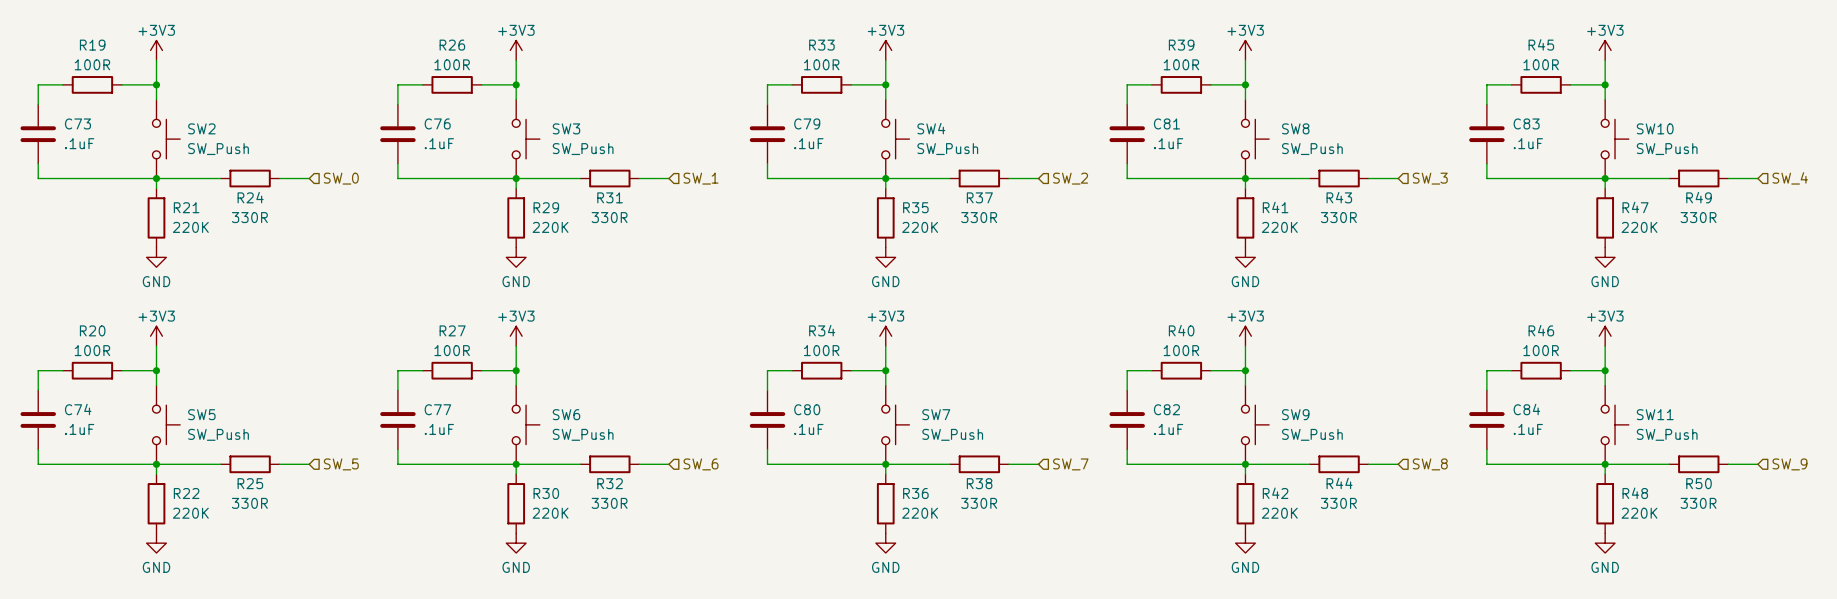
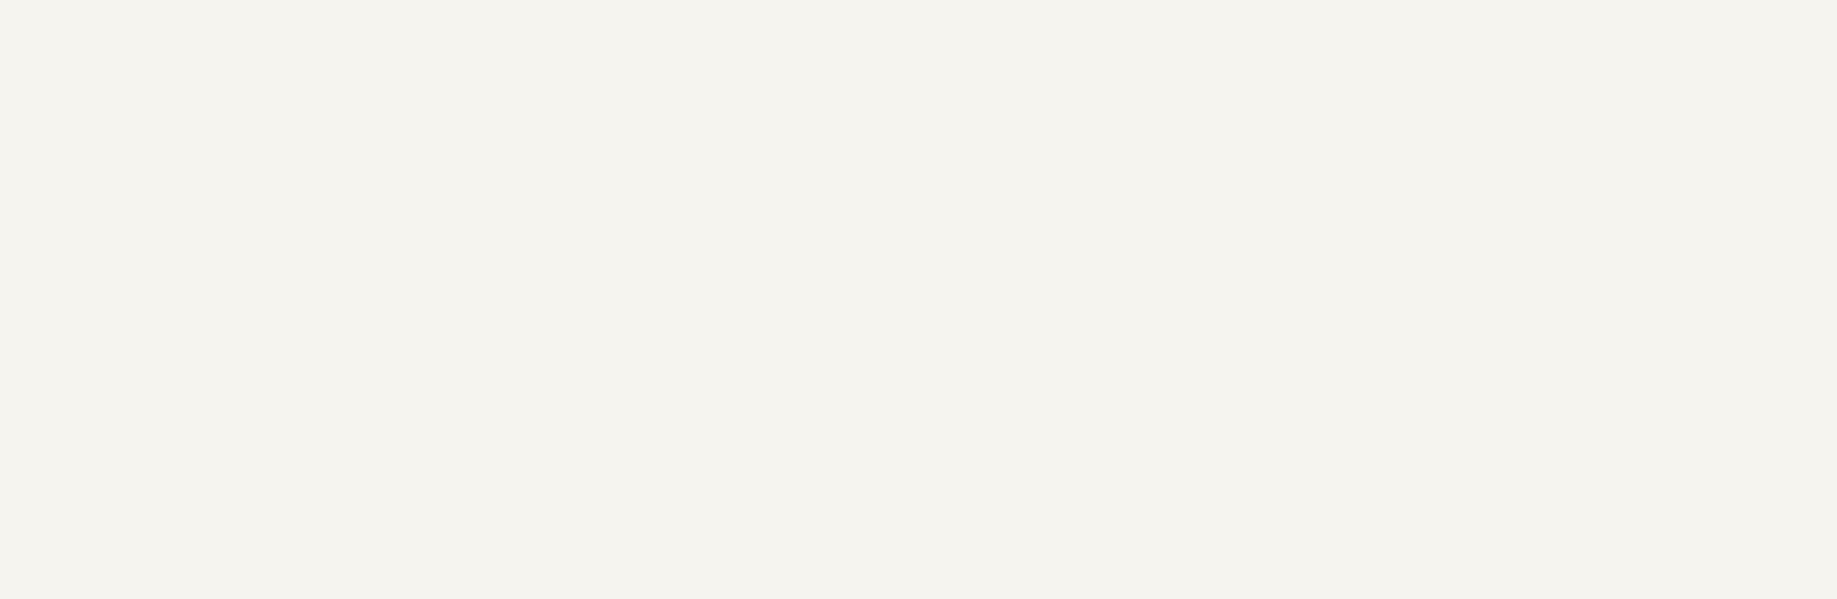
power symbol: +3V3 (156, 50) -> none
power symbol: +3V3 (516, 50) -> none
power symbol: +3V3 (885, 50) -> none
power symbol: +3V3 (1245, 50) -> none
power symbol: +3V3 (1605, 50) -> none
wire: (156, 60) (156, 99) -> none
wire: (516, 60) (516, 99) -> none
wire: (885, 60) (885, 99) -> none
wire: (1245, 60) (1245, 99) -> none
wire: (1605, 60) (1605, 99) -> none
wire: (62, 84) (38, 84) (38, 104) -> none
R19: 100R (92, 84) -> none
wire: (122, 84) (156, 84) -> none
junction: (156, 84) -> none
wire: (422, 84) (397, 84) (397, 104) -> none
R26: 100R (452, 84) -> none
wire: (481, 84) (516, 84) -> none
junction: (516, 84) -> none
wire: (792, 84) (767, 84) (767, 104) -> none
R33: 100R (821, 84) -> none
wire: (851, 84) (885, 84) -> none
junction: (885, 84) -> none
wire: (1151, 84) (1127, 84) (1127, 104) -> none
R39: 100R (1181, 84) -> none
wire: (1210, 84) (1245, 84) -> none
junction: (1245, 84) -> none
wire: (1511, 84) (1486, 84) (1486, 104) -> none
R45: 100R (1541, 84) -> none
wire: (1570, 84) (1605, 84) -> none
junction: (1605, 84) -> none
C73: .1uF (38, 134) -> none
C76: .1uF (397, 134) -> none
C79: .1uF (767, 134) -> none
C81: .1uF (1127, 134) -> none
C83: .1uF (1486, 134) -> none
SW2: SW_Push (166, 139) -> none
SW3: SW_Push (526, 139) -> none
SW4: SW_Push (895, 139) -> none
SW8: SW_Push (1255, 139) -> none
SW10: SW_Push (1615, 139) -> none
wire: (38, 163) (38, 178) (220, 178) -> none
wire: (397, 163) (397, 178) (580, 178) -> none
wire: (767, 163) (767, 178) (949, 178) -> none
wire: (1127, 163) (1127, 178) (1309, 178) -> none
wire: (1486, 163) (1486, 178) (1669, 178) -> none
wire: (156, 178) (156, 188) -> none
junction: (156, 178) -> none
R24: 330R (250, 178) -> none
wire: (279, 178) (309, 178) -> none
hierarchical label: SW_0 (341, 178) -> none
wire: (516, 178) (516, 188) -> none
junction: (516, 178) -> none
R31: 330R (609, 178) -> none
wire: (639, 178) (668, 178) -> none
hierarchical label: SW_1 (701, 178) -> none
wire: (885, 178) (885, 188) -> none
junction: (885, 178) -> none
R37: 330R (979, 178) -> none
wire: (1008, 178) (1038, 178) -> none
hierarchical label: SW_2 (1070, 178) -> none
wire: (1245, 178) (1245, 188) -> none
junction: (1245, 178) -> none
R43: 330R (1339, 178) -> none
wire: (1368, 178) (1398, 178) -> none
hierarchical label: SW_3 (1430, 178) -> none
wire: (1605, 178) (1605, 188) -> none
junction: (1605, 178) -> none
R49: 330R (1698, 178) -> none
wire: (1728, 178) (1757, 178) -> none
hierarchical label: SW_4 (1790, 178) -> none
R21: 220K (156, 217) -> none
R29: 220K (516, 217) -> none
R35: 220K (885, 217) -> none
R41: 220K (1245, 217) -> none
R47: 220K (1605, 217) -> none
power symbol: GND (156, 257) -> none
power symbol: GND (516, 257) -> none
power symbol: GND (885, 257) -> none
power symbol: GND (1245, 257) -> none
power symbol: GND (1605, 257) -> none
power symbol: +3V3 (156, 336) -> none
power symbol: +3V3 (516, 336) -> none
power symbol: +3V3 (885, 336) -> none
power symbol: +3V3 (1245, 336) -> none
power symbol: +3V3 (1605, 336) -> none
wire: (156, 346) (156, 385) -> none
wire: (516, 346) (516, 385) -> none
wire: (885, 346) (885, 385) -> none
wire: (1245, 346) (1245, 385) -> none
wire: (1605, 346) (1605, 385) -> none
wire: (62, 370) (38, 370) (38, 390) -> none
R20: 100R (92, 370) -> none
wire: (122, 370) (156, 370) -> none
junction: (156, 370) -> none
wire: (422, 370) (397, 370) (397, 390) -> none
R27: 100R (452, 370) -> none
wire: (481, 370) (516, 370) -> none
junction: (516, 370) -> none
wire: (792, 370) (767, 370) (767, 390) -> none
R34: 100R (821, 370) -> none
wire: (851, 370) (885, 370) -> none
junction: (885, 370) -> none
wire: (1151, 370) (1127, 370) (1127, 390) -> none
R40: 100R (1181, 370) -> none
wire: (1210, 370) (1245, 370) -> none
junction: (1245, 370) -> none
wire: (1511, 370) (1486, 370) (1486, 390) -> none
R46: 100R (1541, 370) -> none
wire: (1570, 370) (1605, 370) -> none
junction: (1605, 370) -> none
C74: .1uF (38, 419) -> none
C77: .1uF (397, 419) -> none
C80: .1uF (767, 419) -> none
C82: .1uF (1127, 419) -> none
C84: .1uF (1486, 419) -> none
SW5: SW_Push (166, 424) -> none
SW6: SW_Push (526, 424) -> none
SW7: SW_Push (895, 424) -> none
SW9: SW_Push (1255, 424) -> none
SW11: SW_Push (1615, 424) -> none
wire: (38, 449) (38, 464) (220, 464) -> none
wire: (397, 449) (397, 464) (580, 464) -> none
wire: (767, 449) (767, 464) (949, 464) -> none
wire: (1127, 449) (1127, 464) (1309, 464) -> none
wire: (1486, 449) (1486, 464) (1669, 464) -> none
wire: (156, 464) (156, 474) -> none
junction: (156, 464) -> none
R25: 330R (250, 464) -> none
wire: (279, 464) (309, 464) -> none
hierarchical label: SW_5 (341, 464) -> none
wire: (516, 464) (516, 474) -> none
junction: (516, 464) -> none
R32: 330R (609, 464) -> none
wire: (639, 464) (668, 464) -> none
hierarchical label: SW_6 (701, 464) -> none
wire: (885, 464) (885, 474) -> none
junction: (885, 464) -> none
R38: 330R (979, 464) -> none
wire: (1008, 464) (1038, 464) -> none
hierarchical label: SW_7 (1070, 464) -> none
wire: (1245, 464) (1245, 474) -> none
junction: (1245, 464) -> none
R44: 330R (1339, 464) -> none
wire: (1368, 464) (1398, 464) -> none
hierarchical label: SW_8 (1430, 464) -> none
wire: (1605, 464) (1605, 474) -> none
junction: (1605, 464) -> none
R50: 330R (1698, 464) -> none
wire: (1728, 464) (1757, 464) -> none
hierarchical label: SW_9 (1789, 464) -> none
R22: 220K (156, 503) -> none
R30: 220K (516, 503) -> none
R36: 220K (885, 503) -> none
R42: 220K (1245, 503) -> none
R48: 220K (1605, 503) -> none
power symbol: GND (156, 543) -> none
power symbol: GND (516, 543) -> none
power symbol: GND (885, 543) -> none
power symbol: GND (1245, 543) -> none
power symbol: GND (1605, 543) -> none

